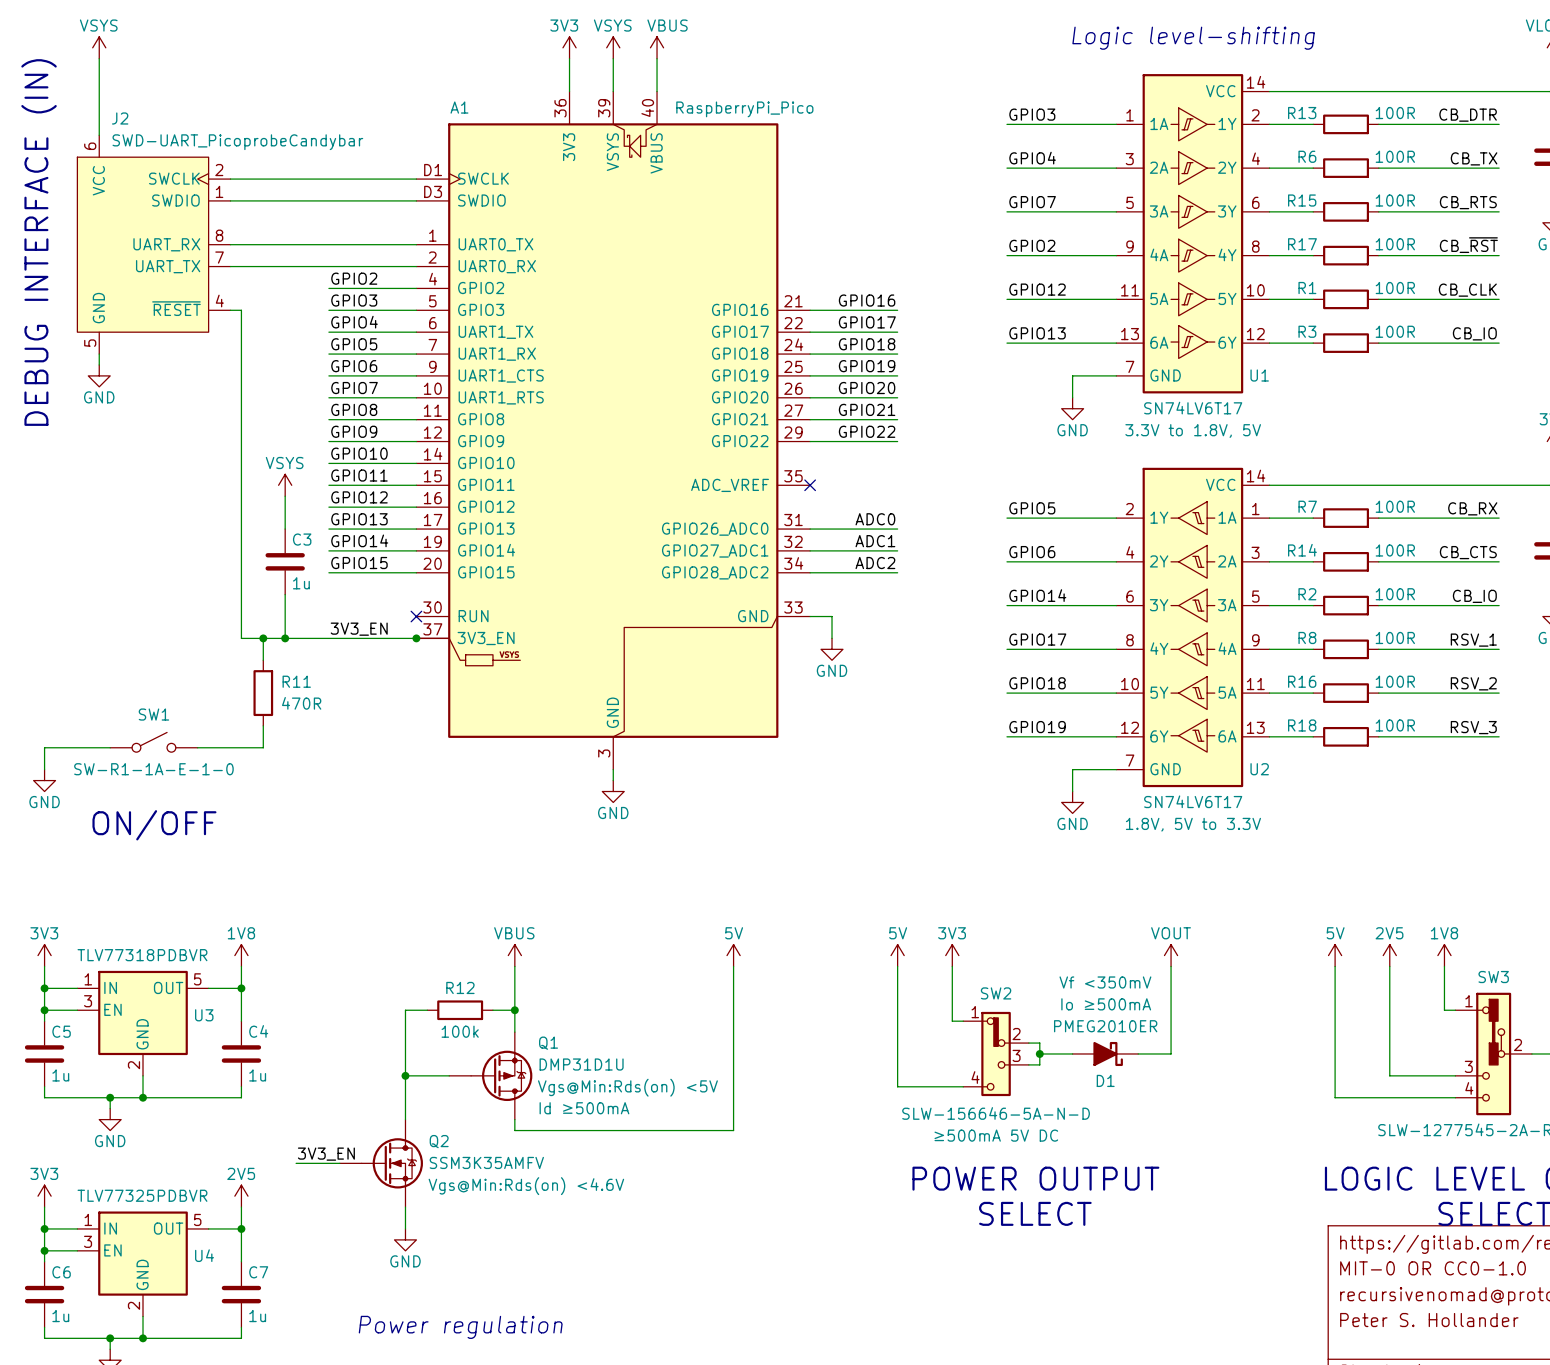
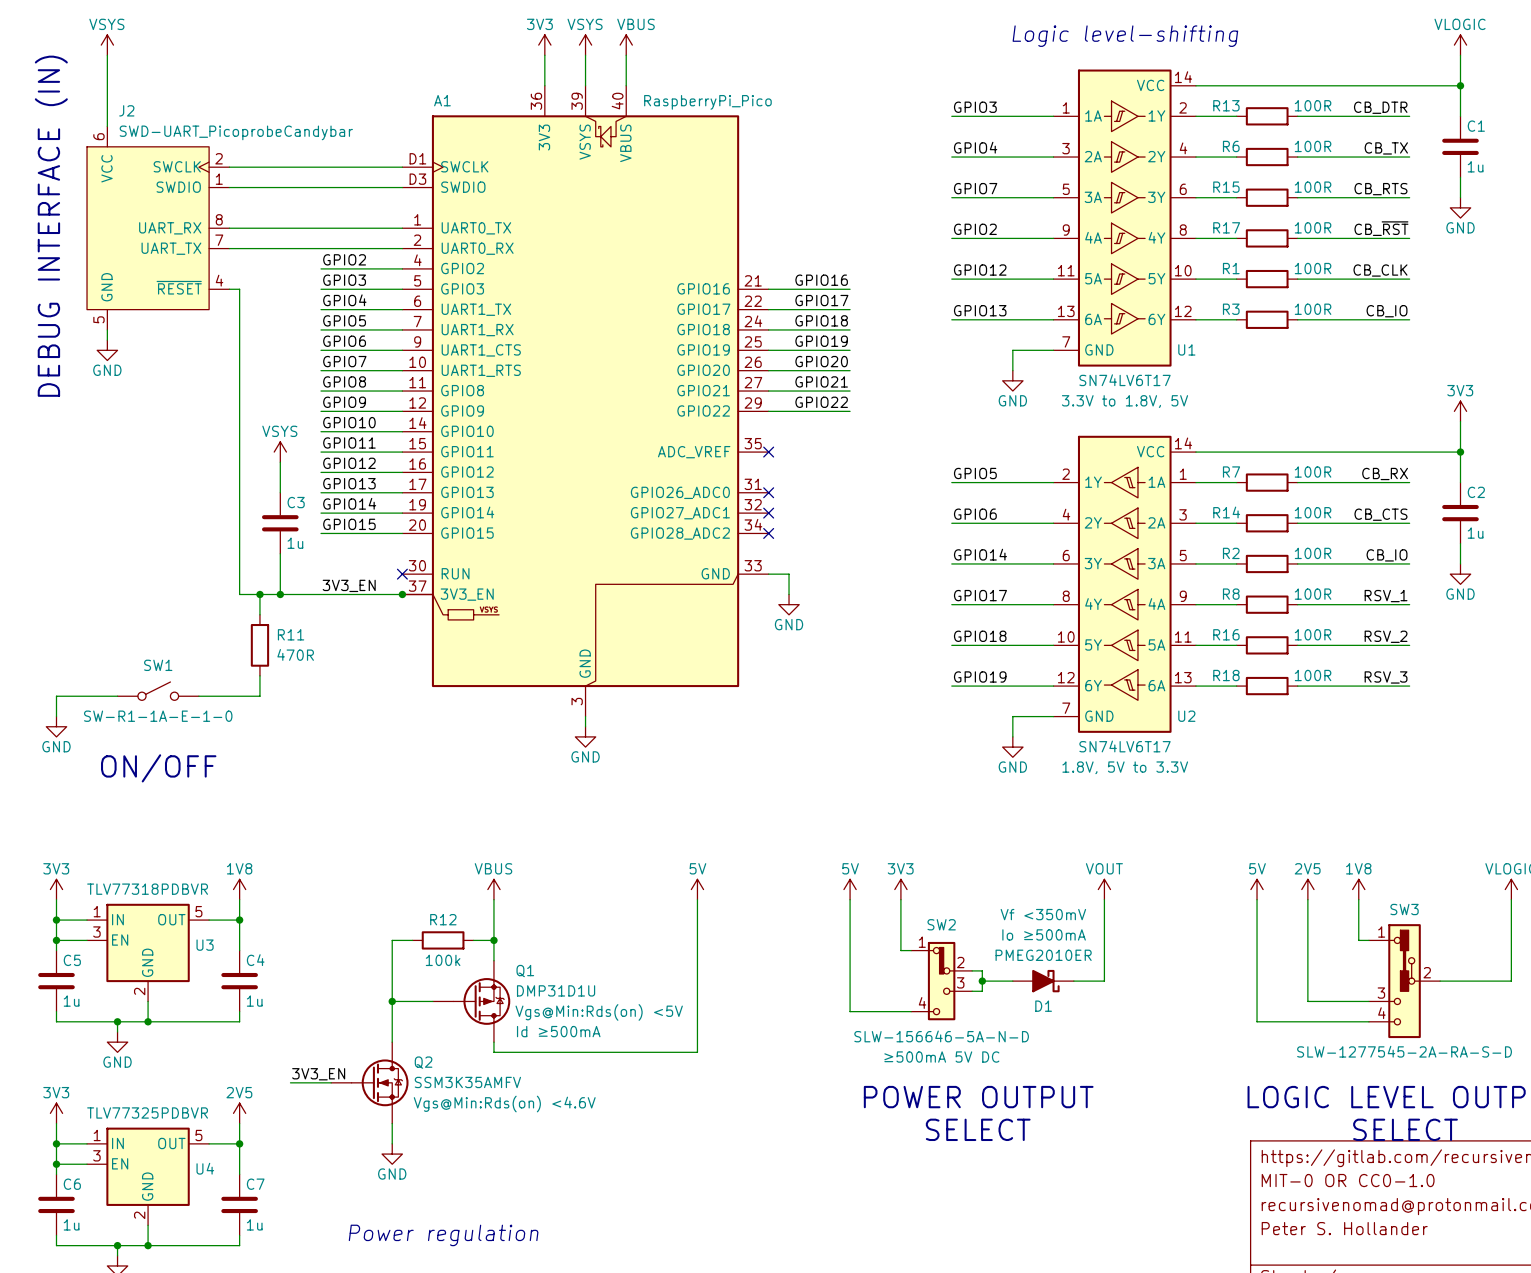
label: ADC0 (875, 519) -> none
wire: (810, 529) (897, 529) -> none
no-connect mark: none -> (768, 492)
label: ADC1 (875, 541) -> none
wire: (810, 550) (897, 550) -> none
no-connect mark: none -> (768, 513)
label: ADC2 (875, 563) -> none
wire: (810, 572) (897, 572) -> none
no-connect mark: none -> (768, 533)

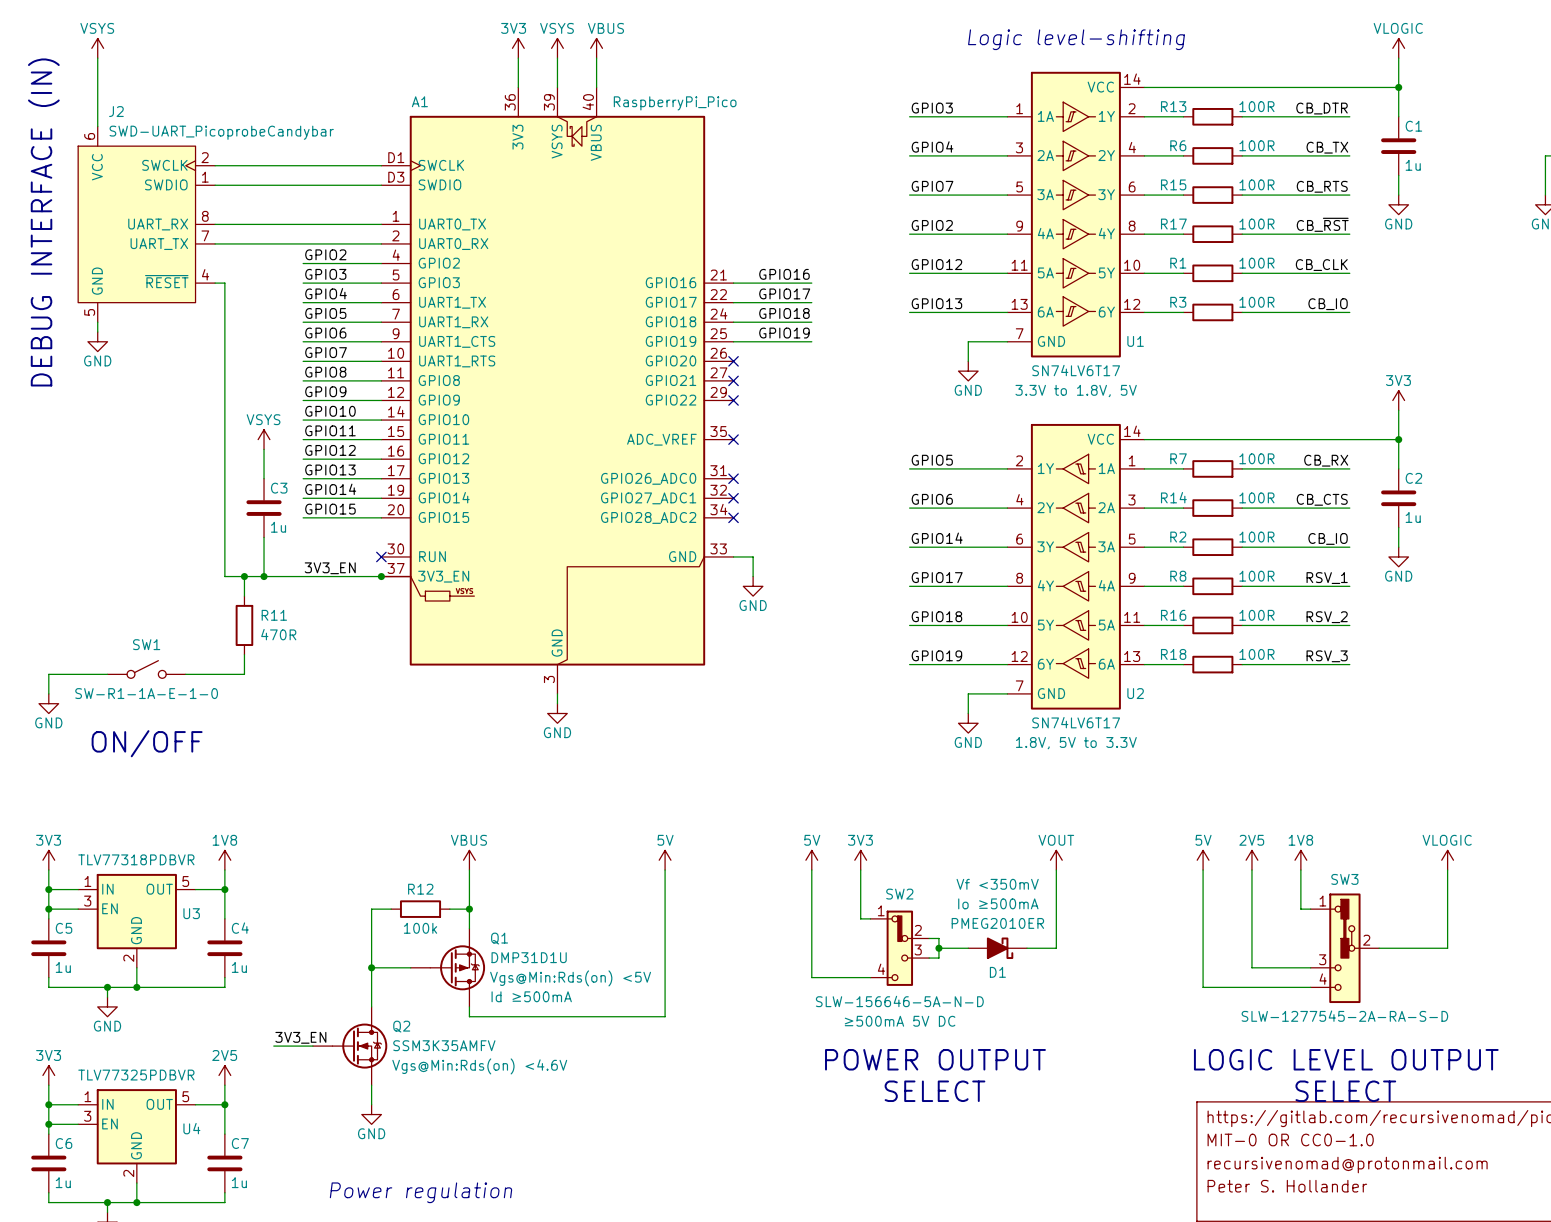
label: GPIO20 (821, 361) -> none
wire: (768, 370) (850, 370) -> none
no-connect mark: none -> (733, 361)
label: GPIO21 (821, 381) -> none
wire: (768, 391) (850, 391) -> none
no-connect mark: none -> (733, 380)
label: GPIO22 (821, 402) -> none
wire: (768, 411) (850, 411) -> none
no-connect mark: none -> (733, 400)

